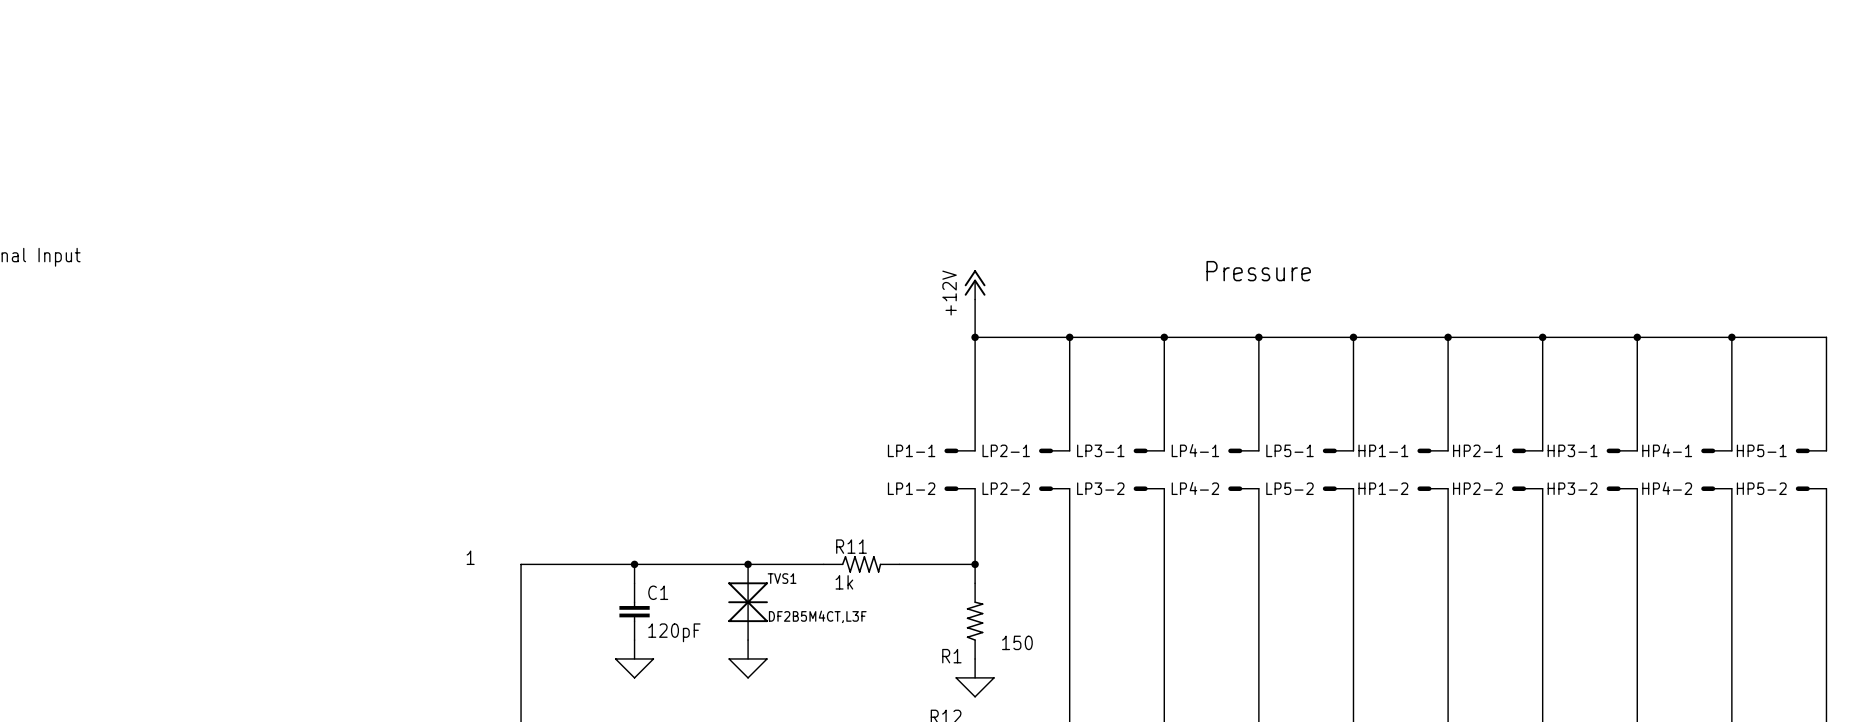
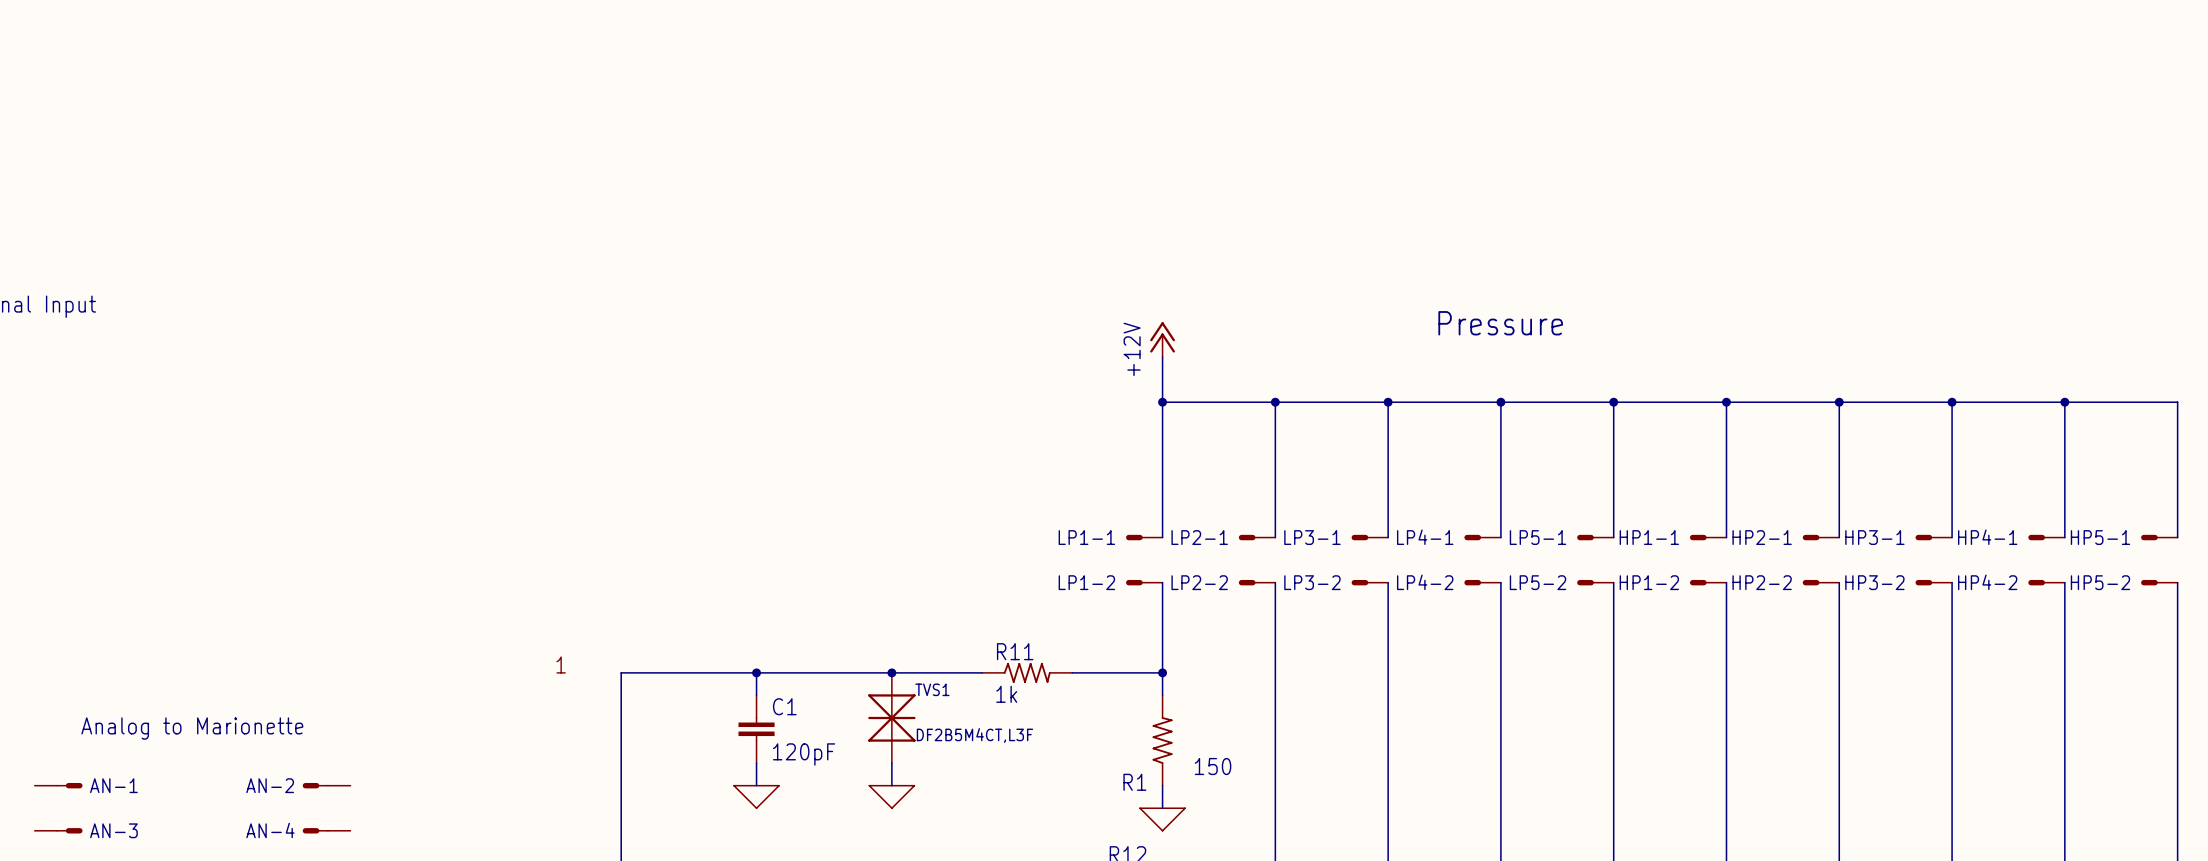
AN-1: none -> (58, 785)
AN-2: none -> (326, 785)
AN-3: none -> (58, 830)
AN-4: none -> (326, 830)

